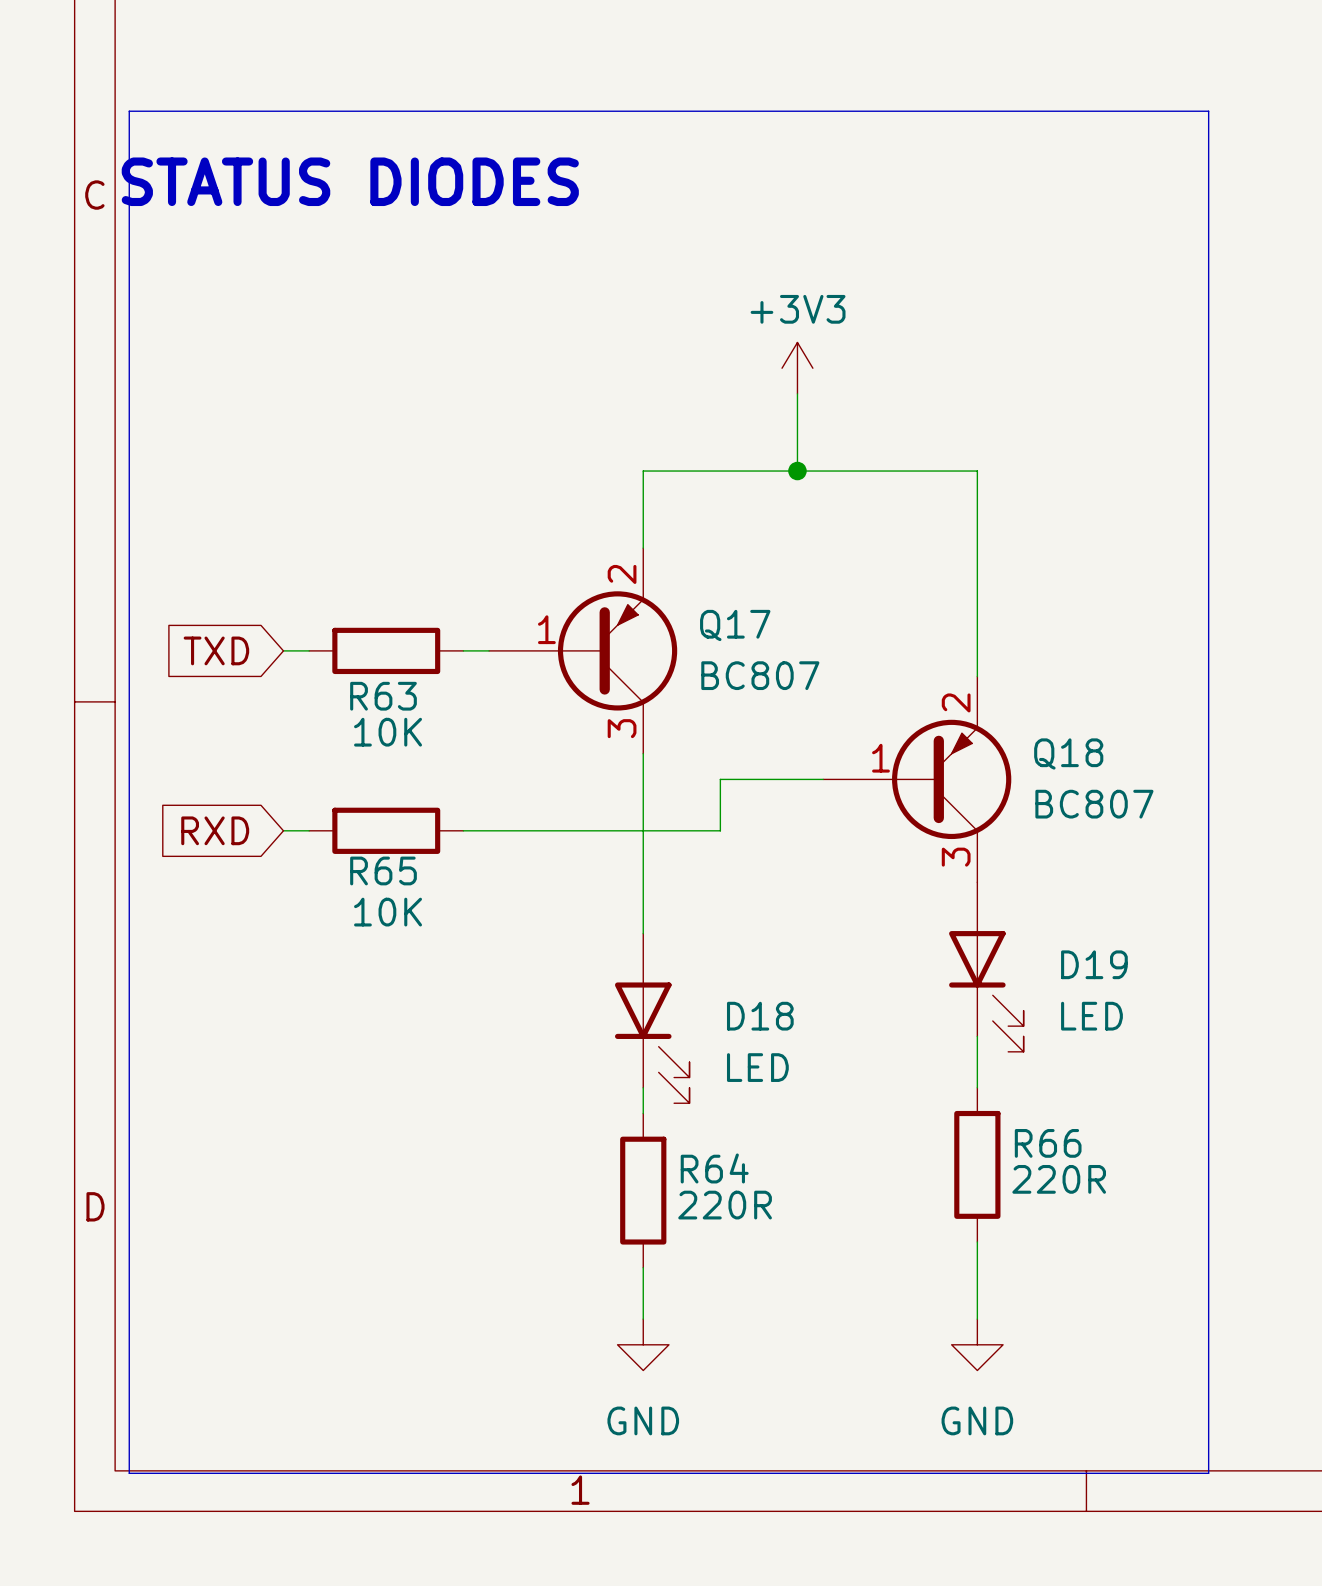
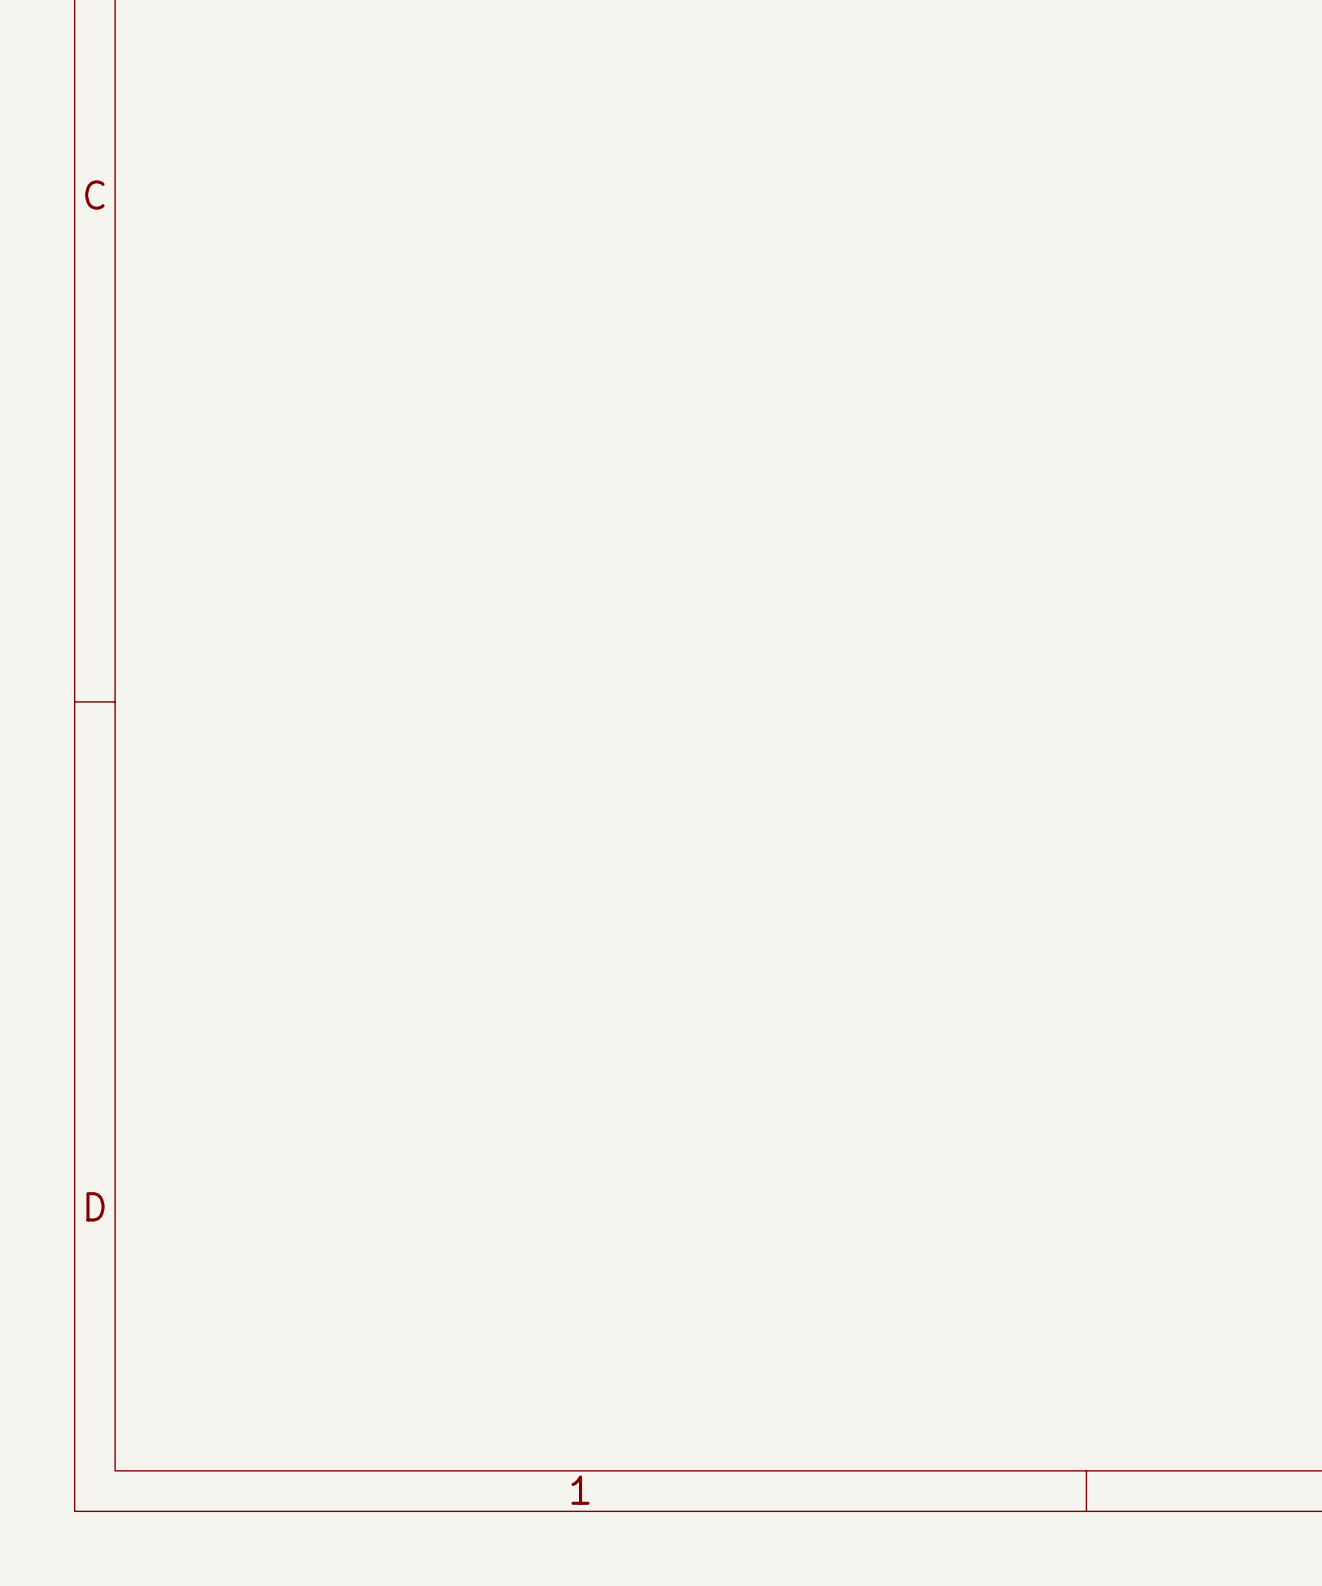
line: (129, 111) (1208, 111) (1208, 1473) (129, 1473) (129, 111) -> none
text: STATUS DIODES (350, 181) -> none
power symbol: +3V3 (797, 368) -> none
wire: (797, 393) (797, 471) -> none
junction: (797, 471) -> none
wire: (643, 548) (643, 471) (977, 471) (977, 676) -> none
global label: TXD (216, 650) -> none
wire: (283, 650) (309, 650) -> none
R63: 10K (386, 650) -> none
wire: (463, 650) (489, 650) -> none
Q17: BC807 (583, 650) -> none
wire: (643, 753) (643, 933) -> none
wire: (823, 779) (720, 779) (720, 830) (463, 830) -> none
Q18: BC807 (917, 779) -> none
global label: RXD (215, 830) -> none
wire: (283, 830) (309, 830) -> none
R65: 10K (386, 830) -> none
D19: LED (986, 967) -> none
D18: LED (652, 1018) -> none
wire: (977, 1036) (977, 1087) -> none
wire: (643, 1087) (643, 1113) -> none
R66: 220R (977, 1164) -> none
R64: 220R (643, 1190) -> none
wire: (977, 1242) (977, 1319) -> none
wire: (643, 1267) (643, 1319) -> none
power symbol: GND (643, 1344) -> none
power symbol: GND (977, 1344) -> none

